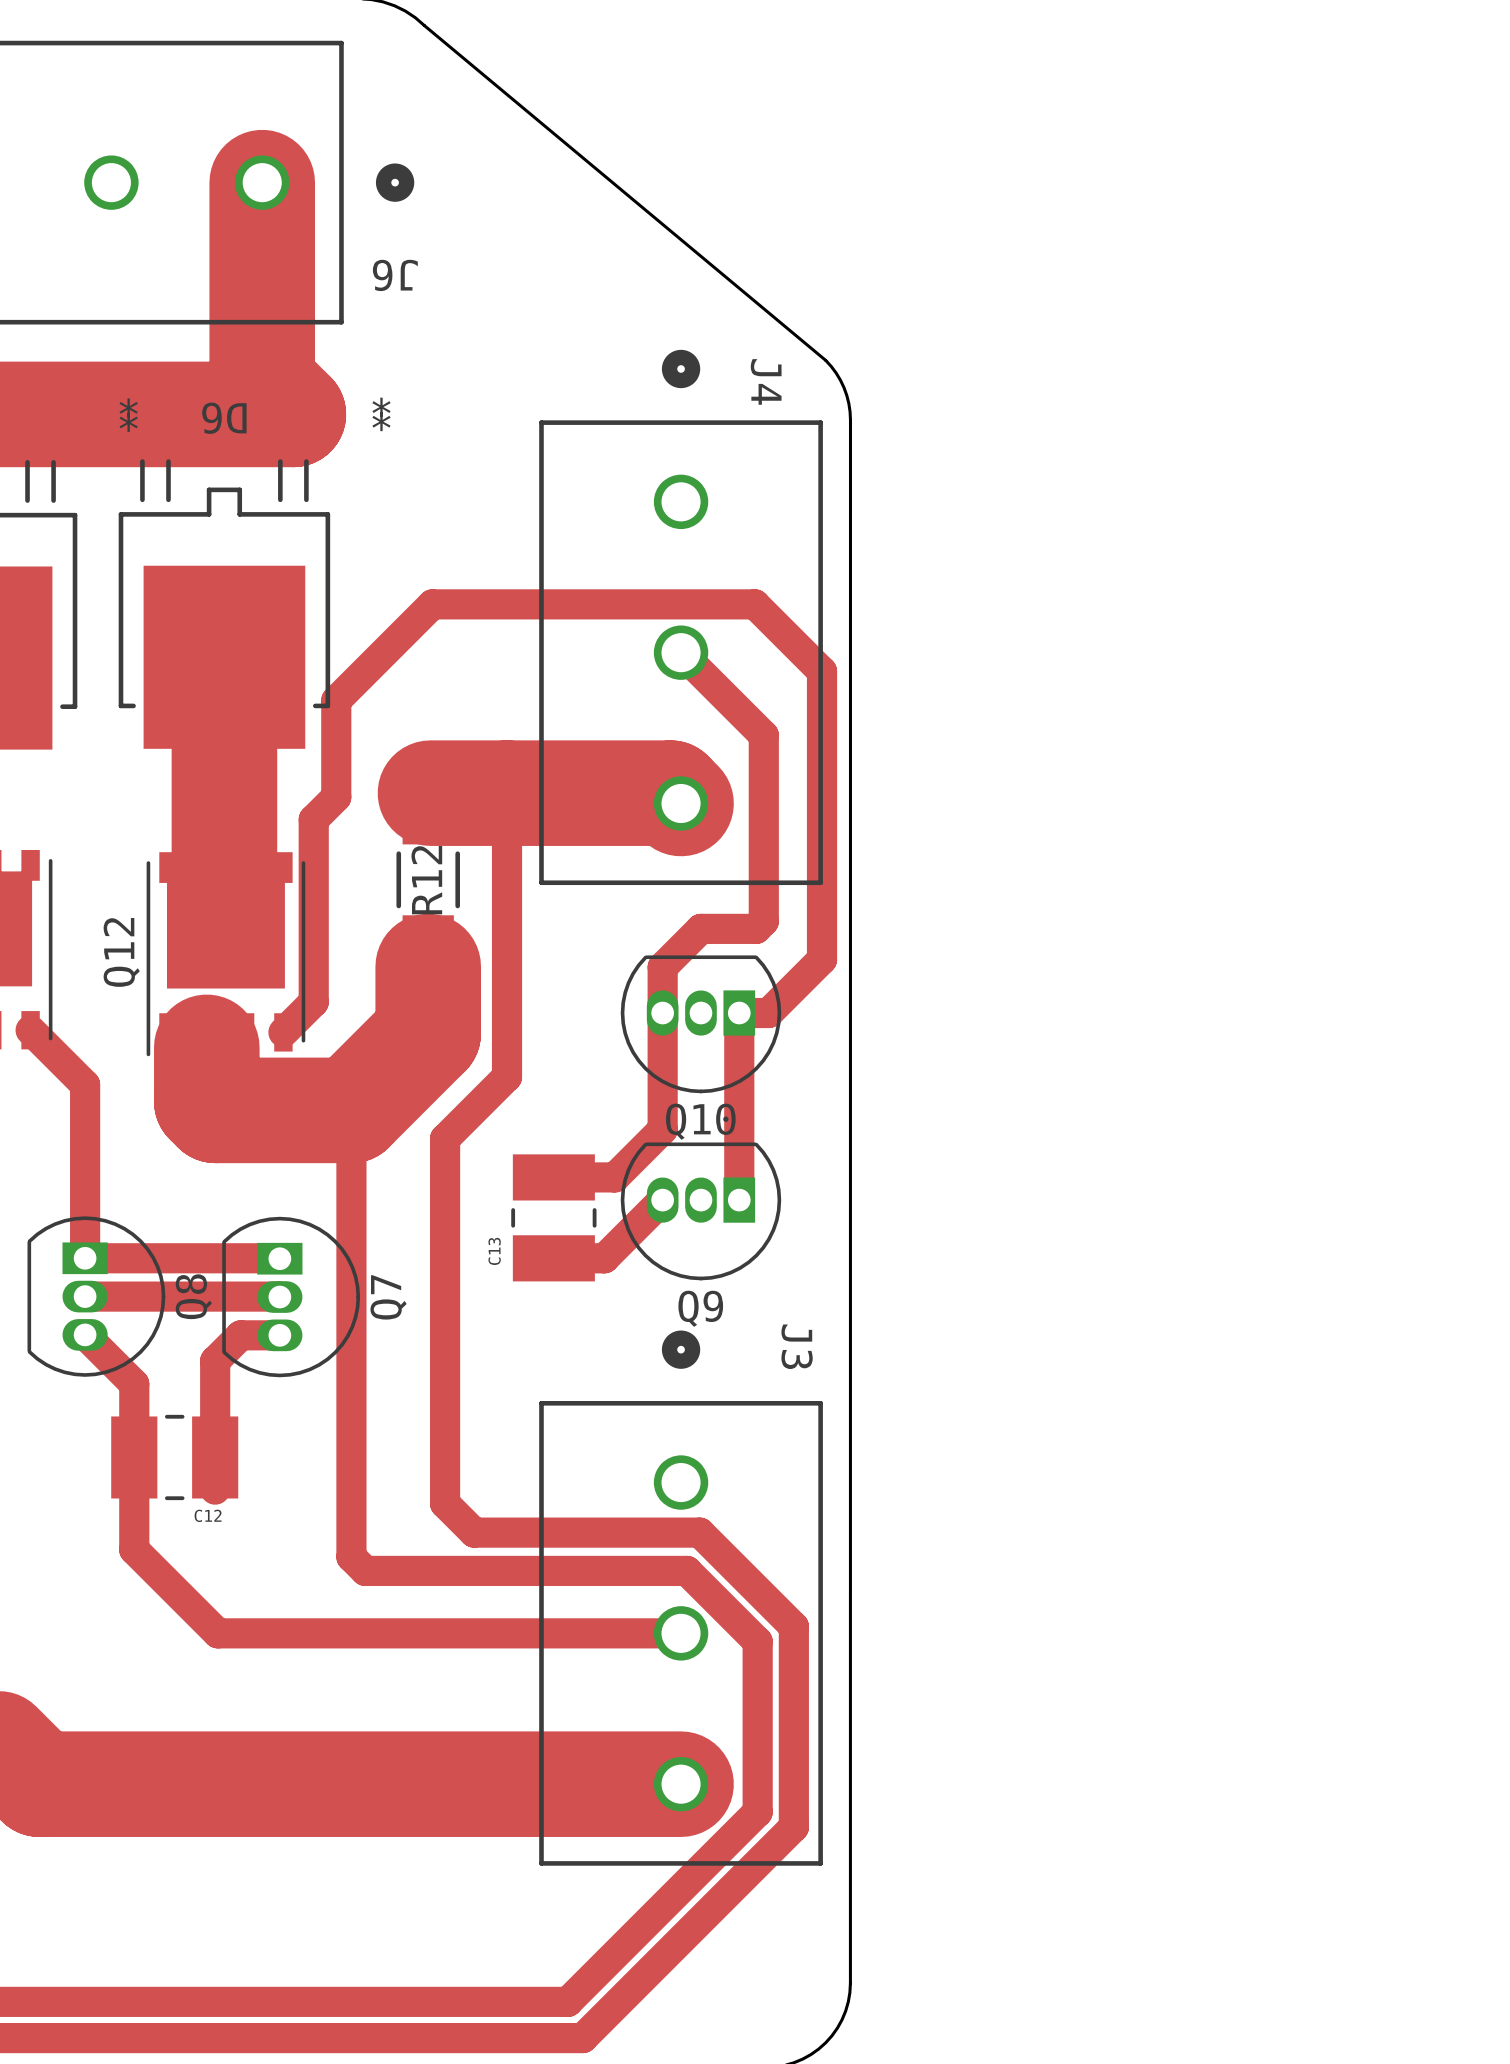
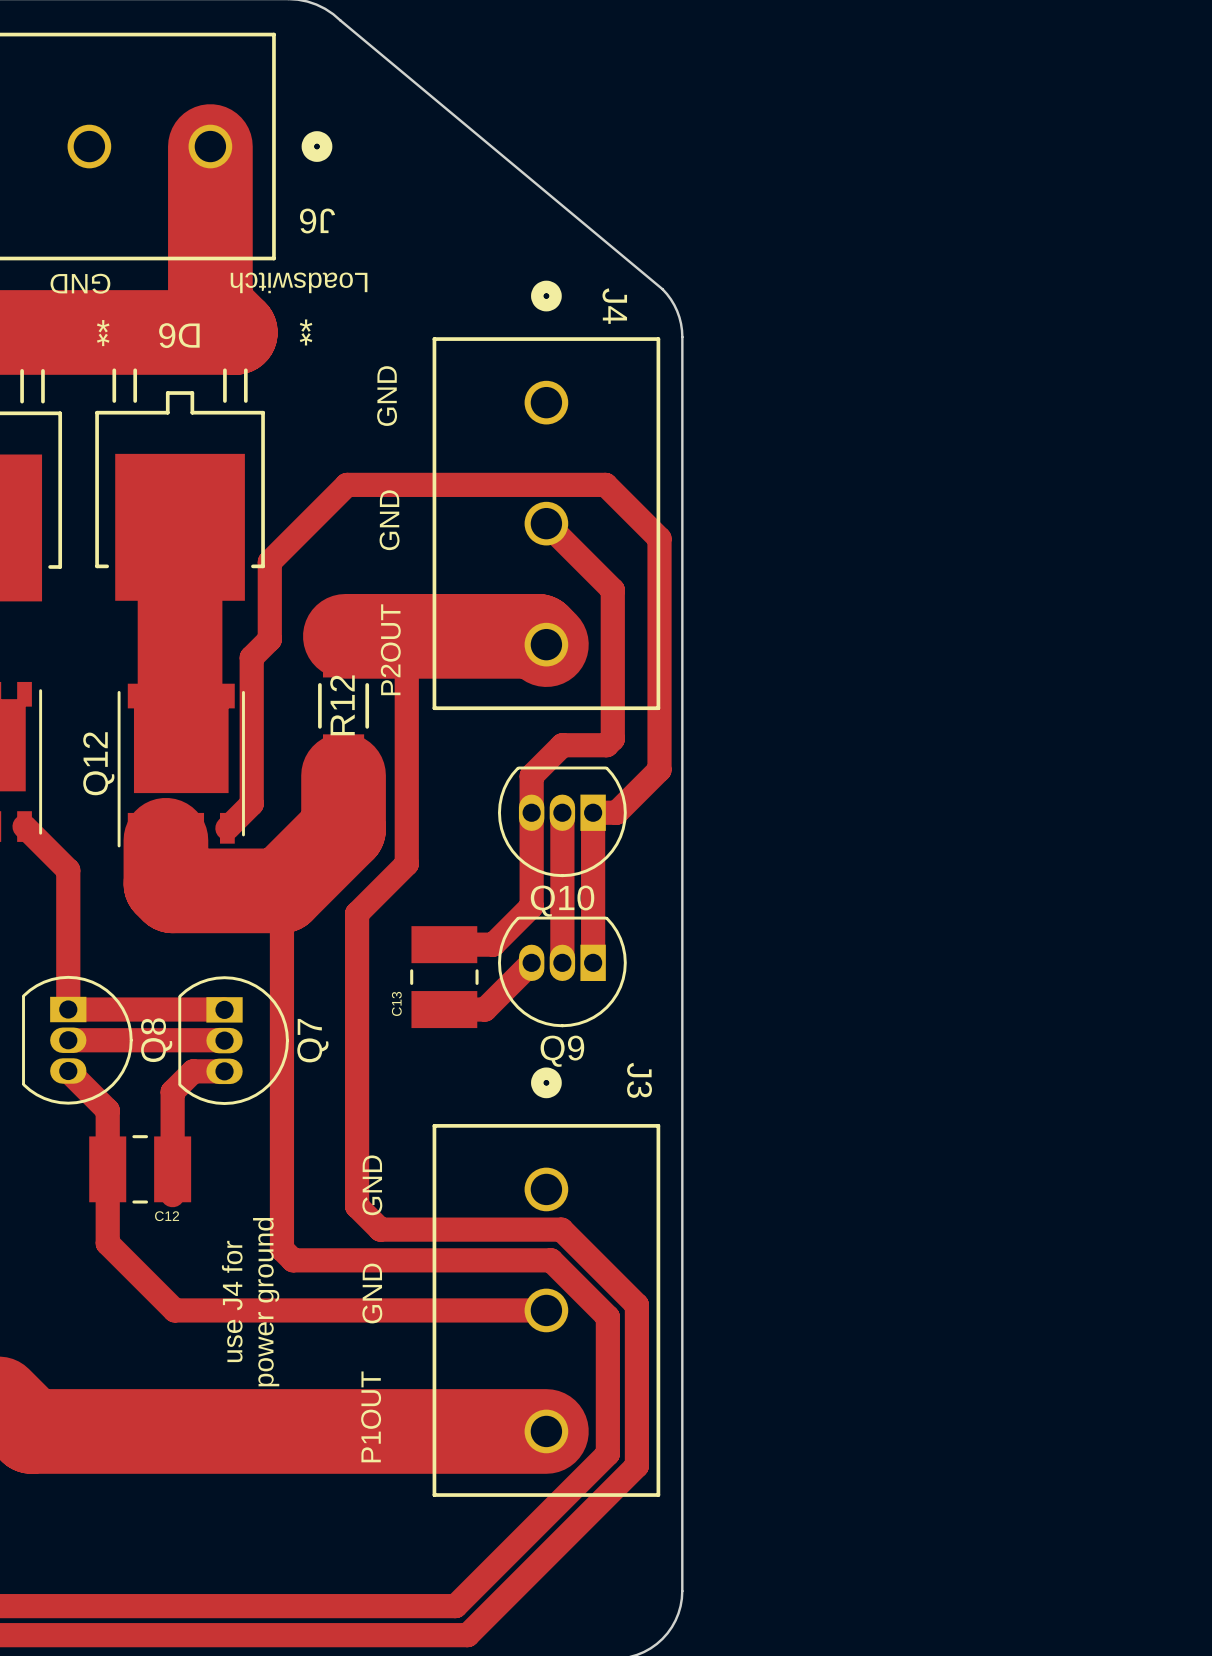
text: none -> Loadswitch (299, 282)
text: none -> GND (80, 283)
text: none -> GND (387, 396)
text: none -> GND (389, 520)
text: none -> P2OUT (390, 649)
track: none -> (562, 812) (562, 962)
text: none -> GND (372, 1185)
text: none -> GND (372, 1293)
text: none -> use J4 for (232, 1301)
text: none -> power ground (266, 1302)
text: none -> P1OUT (371, 1416)

